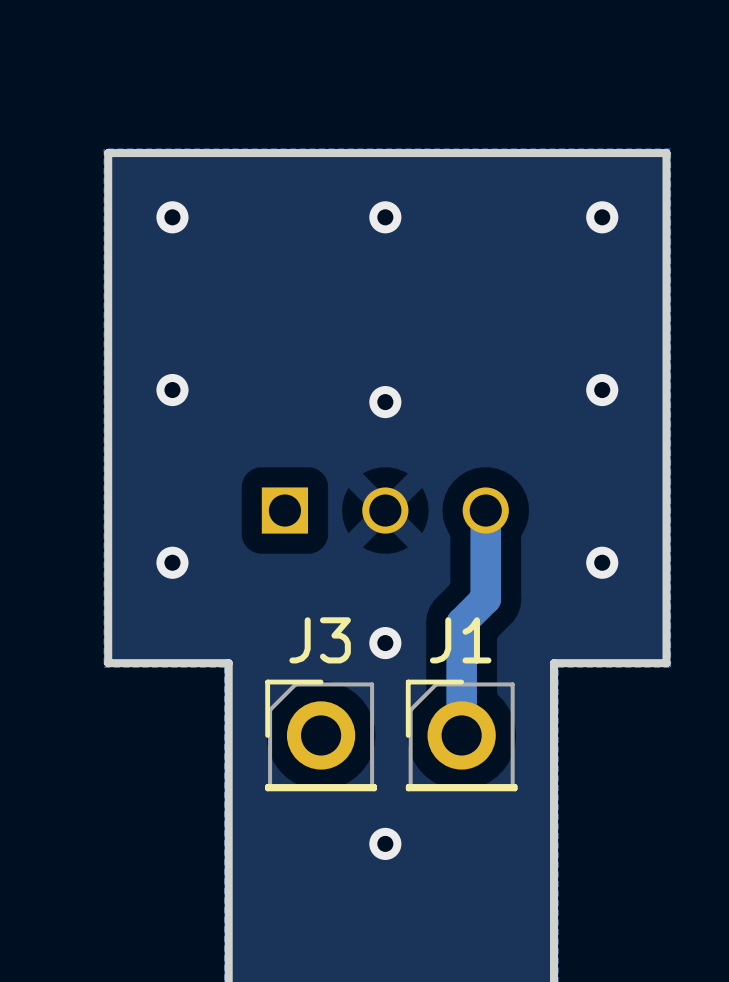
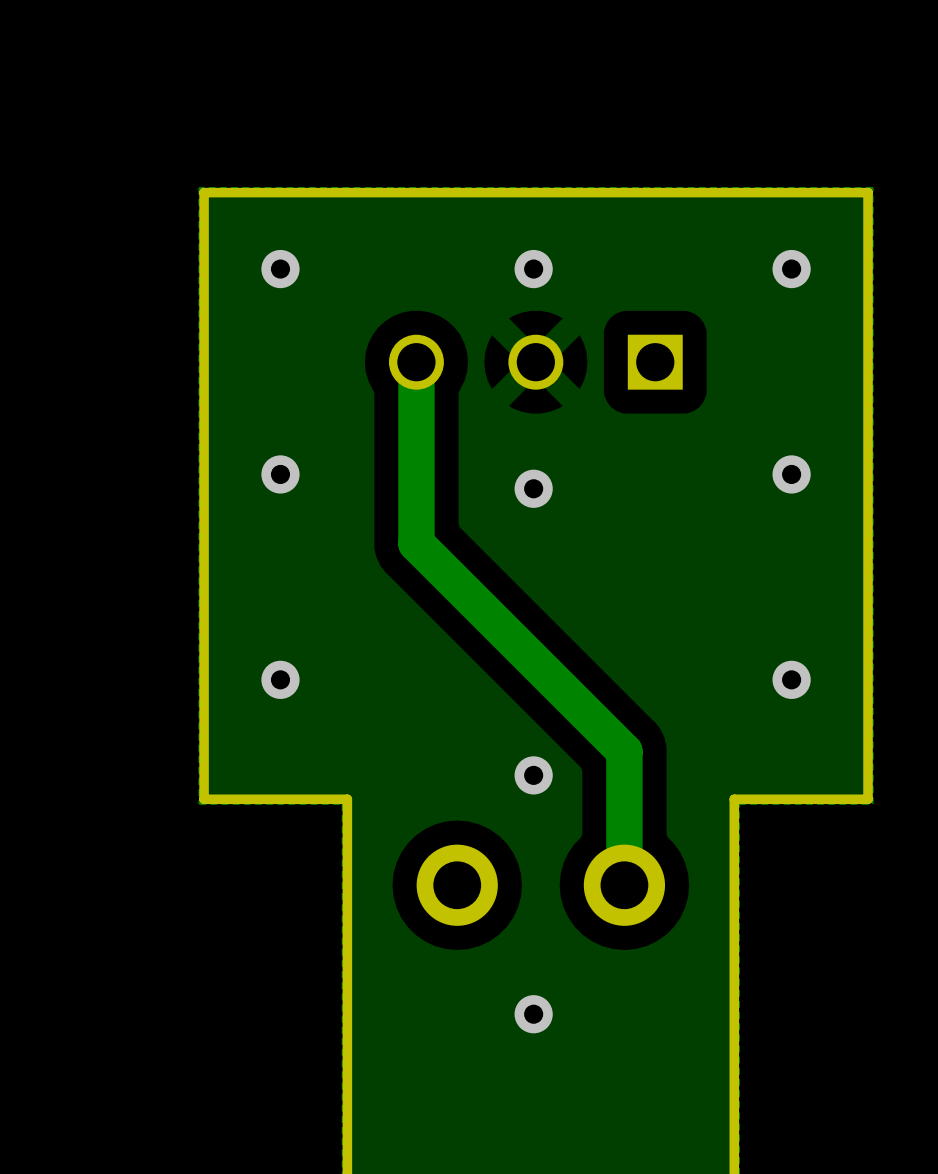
part rotation: 0° (385, 510) -> 180° (535, 362)
part position: (385, 510) -> (535, 362)
track: (485, 510) (485, 598) (461, 622) -> (416, 362) (416, 543) (624, 751)
J3 side: bottom (321, 735) -> top (457, 885)
J1 side: bottom (461, 735) -> top (624, 885)

